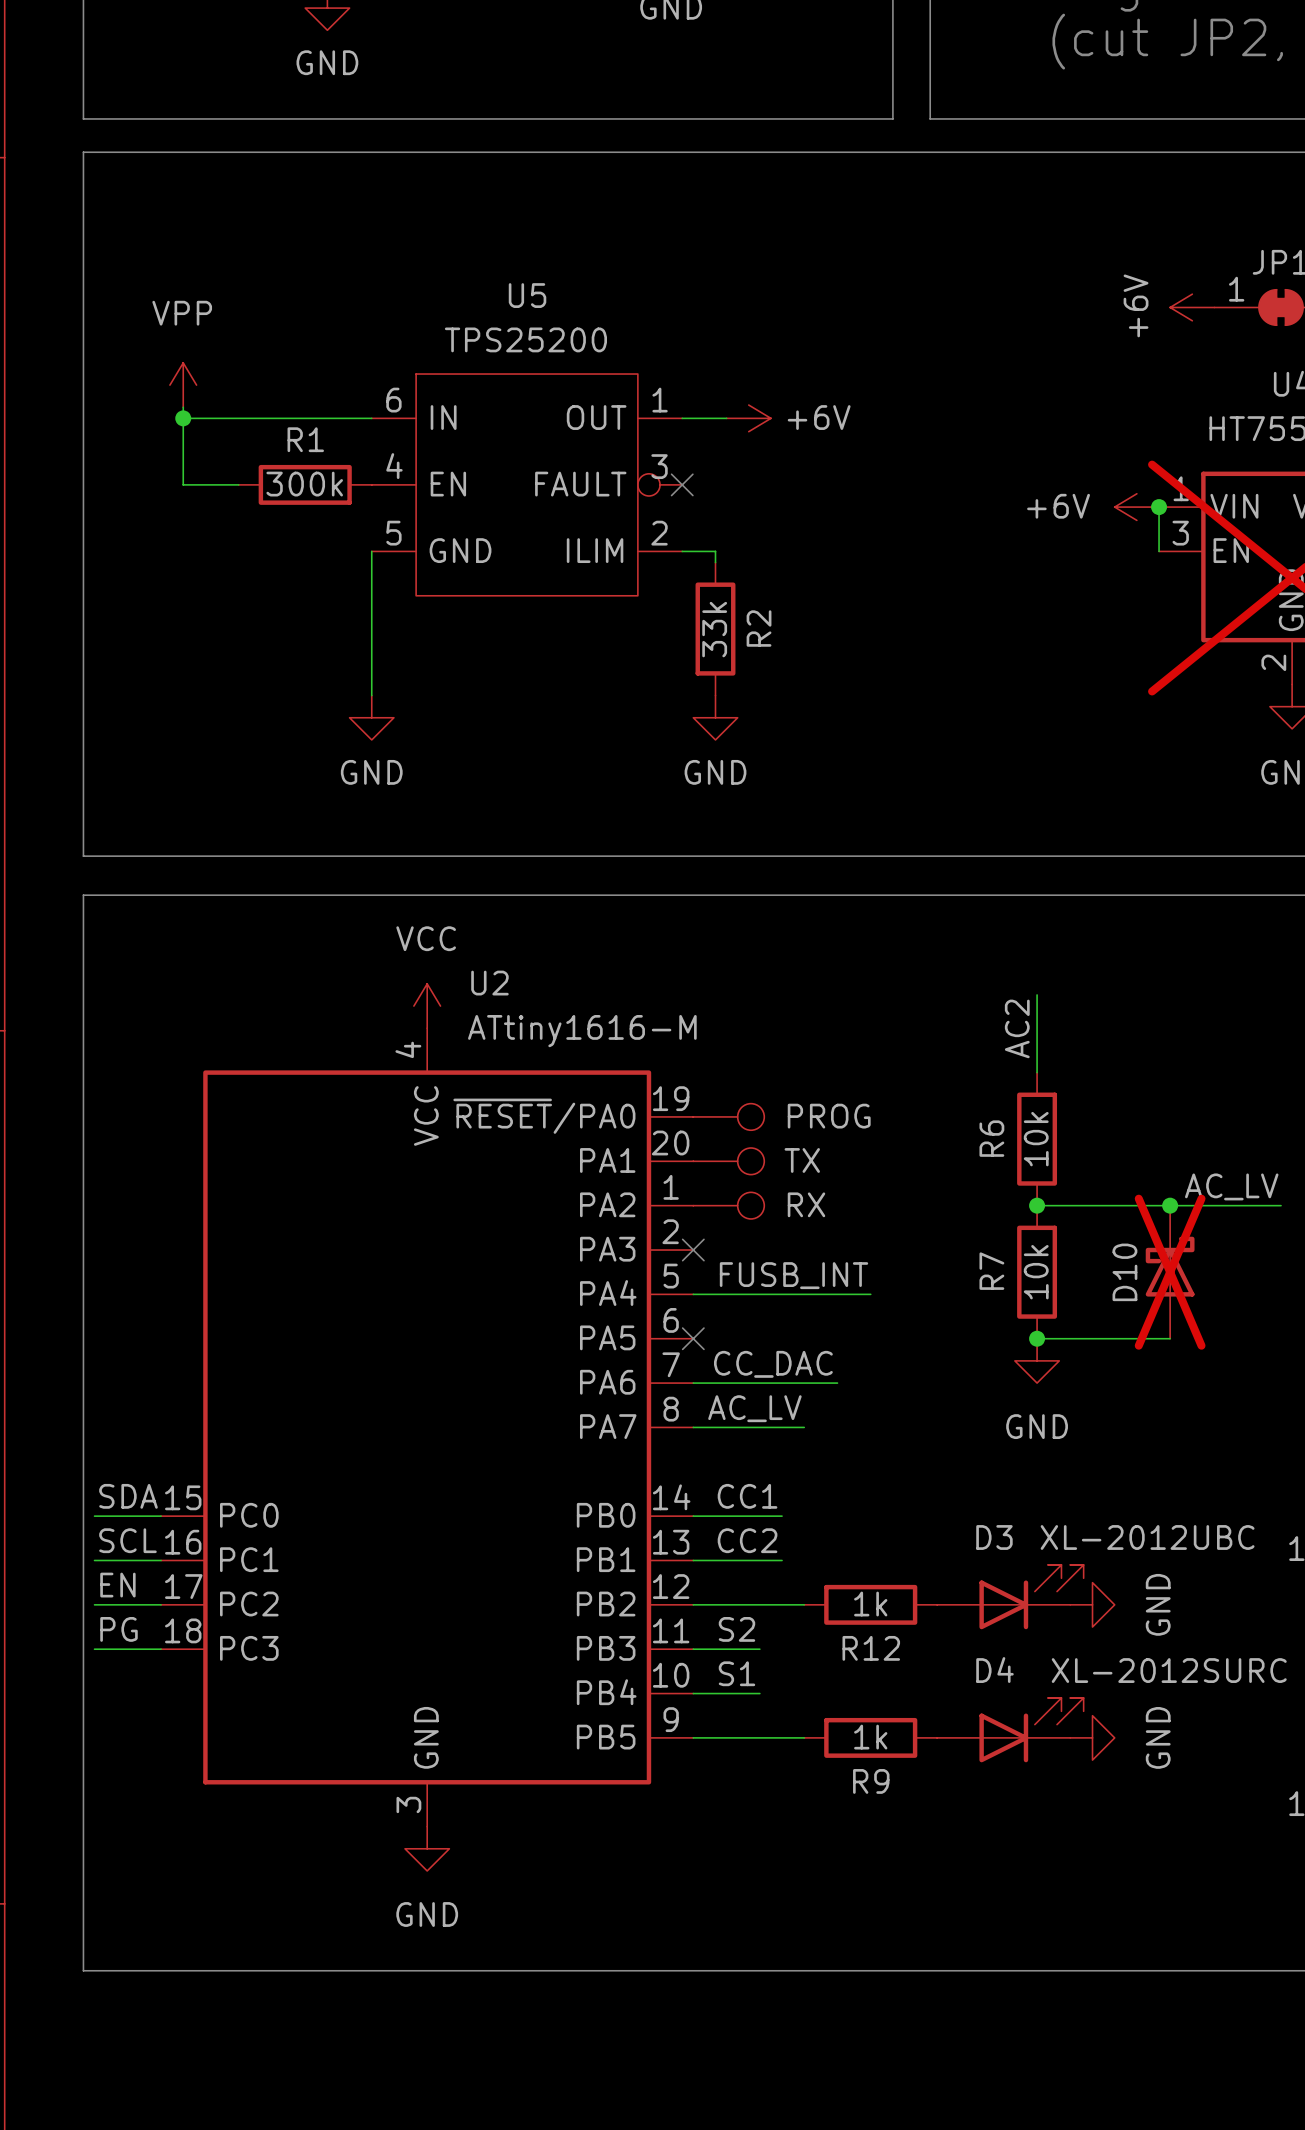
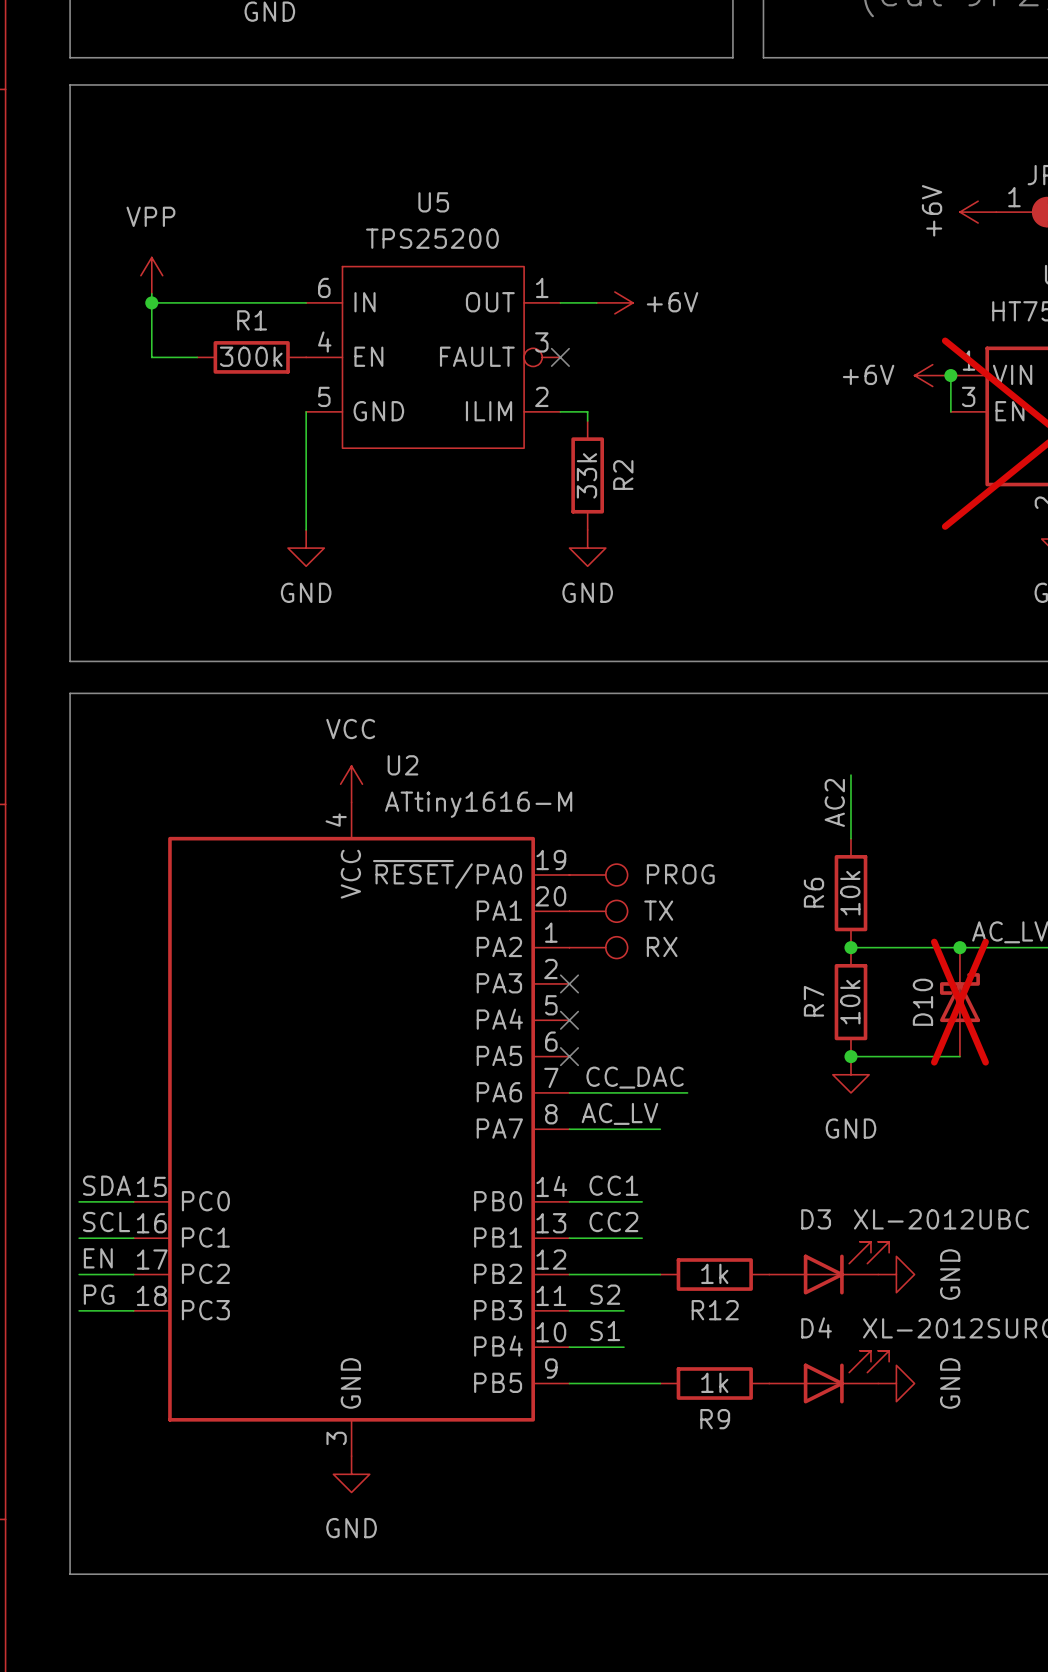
label: FUSB_INT (794, 1275) -> none
wire: (693, 1294) (870, 1294) -> none
no-connect mark: none -> (569, 1020)

